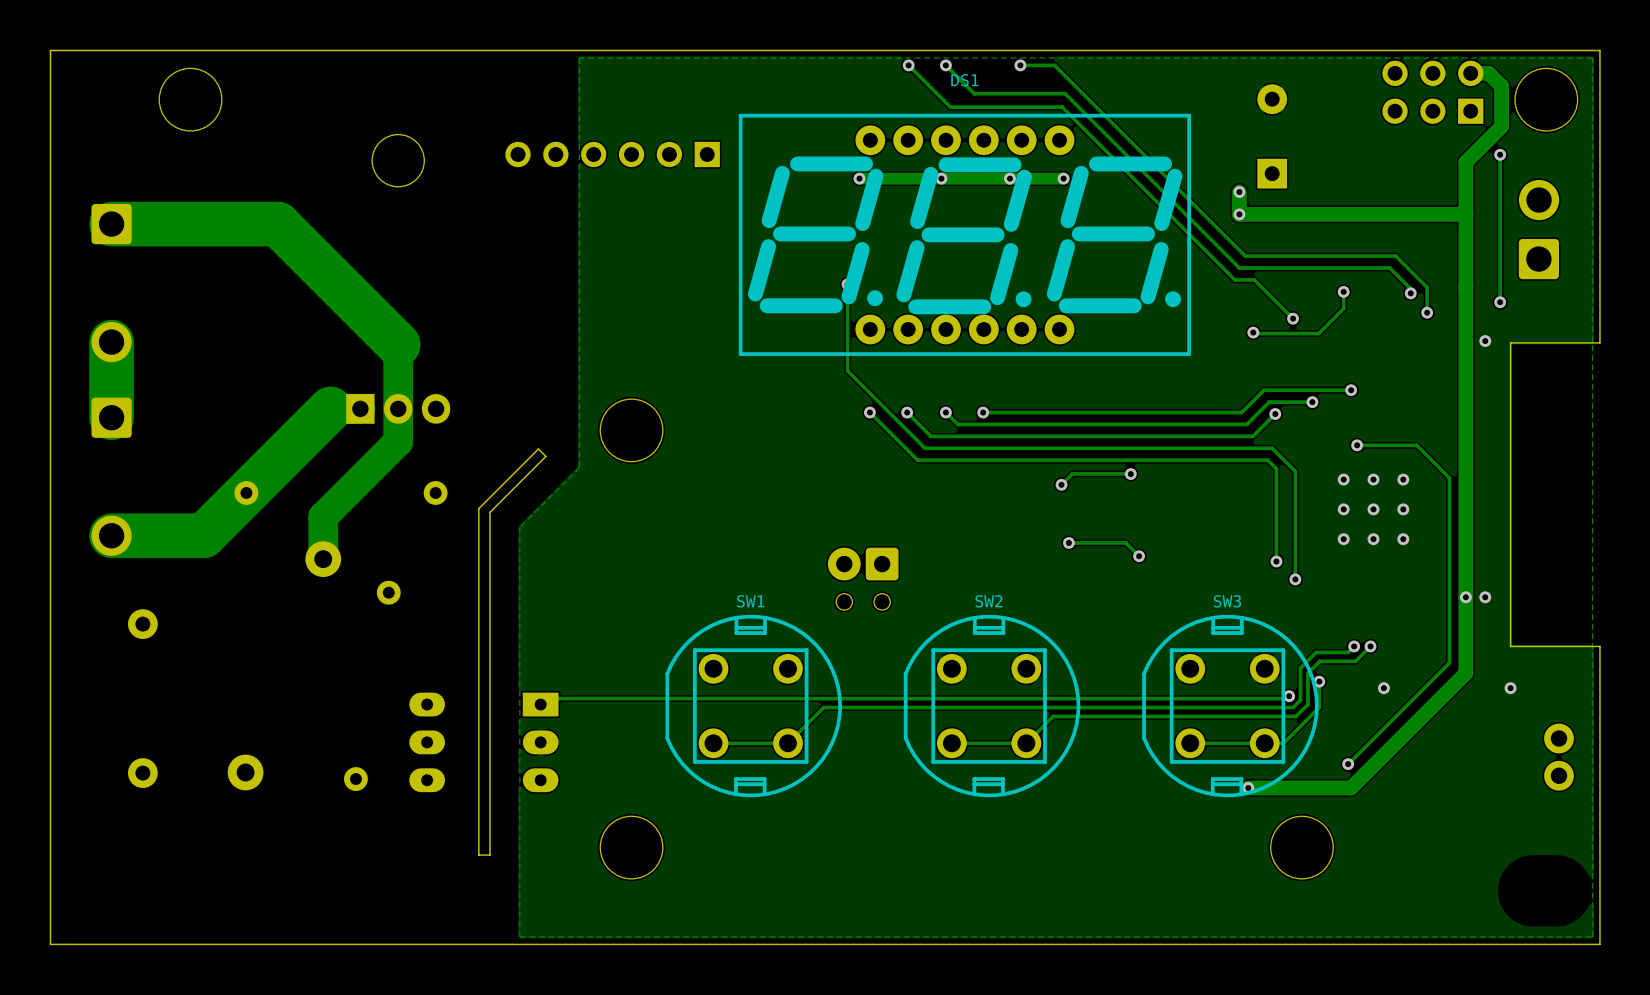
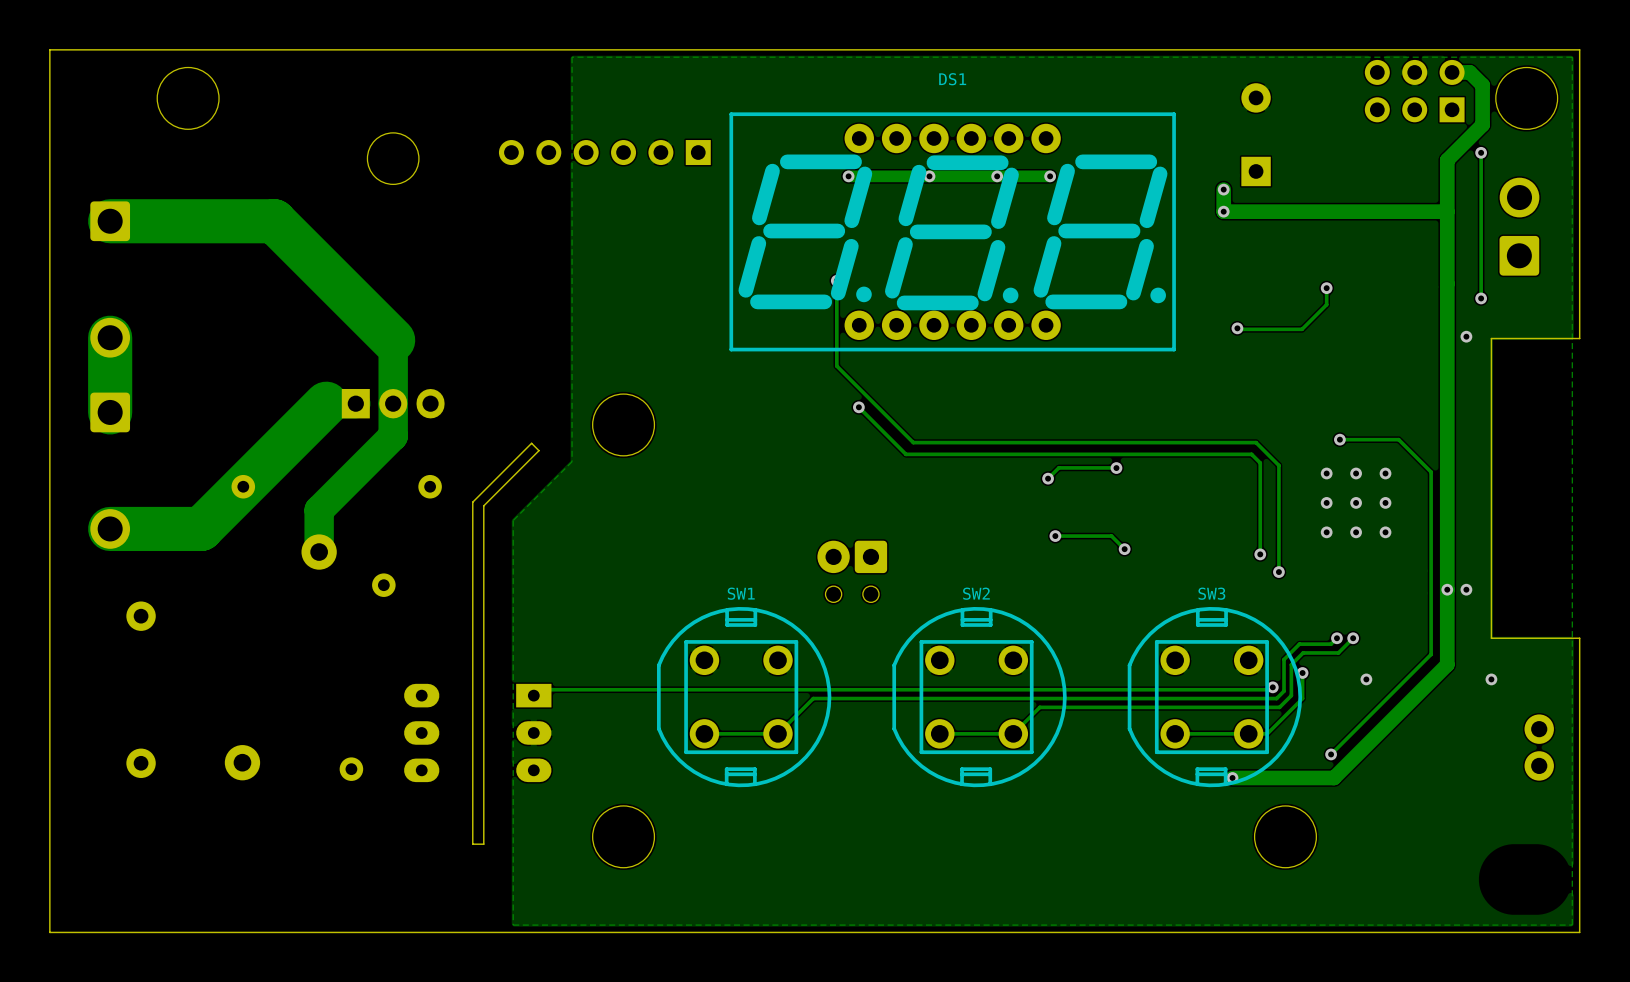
track: (908, 65) (950, 107) (1062, 107) (1234, 279) (1254, 279) (1293, 318) -> none
via: (908, 65) -> none
track: (945, 65) (974, 93) (1065, 93) (1239, 268) (1389, 268) (1410, 288) (1410, 293) -> none
via: (945, 65) -> none
track: (1020, 65) (1054, 65) (1245, 256) (1395, 256) (1427, 287) (1427, 312) -> none
via: (1020, 65) -> none
via: (1410, 293) -> none
via: (1427, 312) -> none
via: (1293, 318) -> none
track: (1351, 390) (1264, 390) (1241, 412) (983, 412) -> none
via: (1351, 390) -> none
track: (1312, 402) (1269, 402) (1246, 424) (957, 424) (945, 412) -> none
via: (1312, 402) -> none
track: (907, 412) (931, 436) (1252, 436) (1275, 414) -> none
via: (907, 412) -> none
via: (945, 412) -> none
via: (983, 412) -> none
via: (1275, 414) -> none

